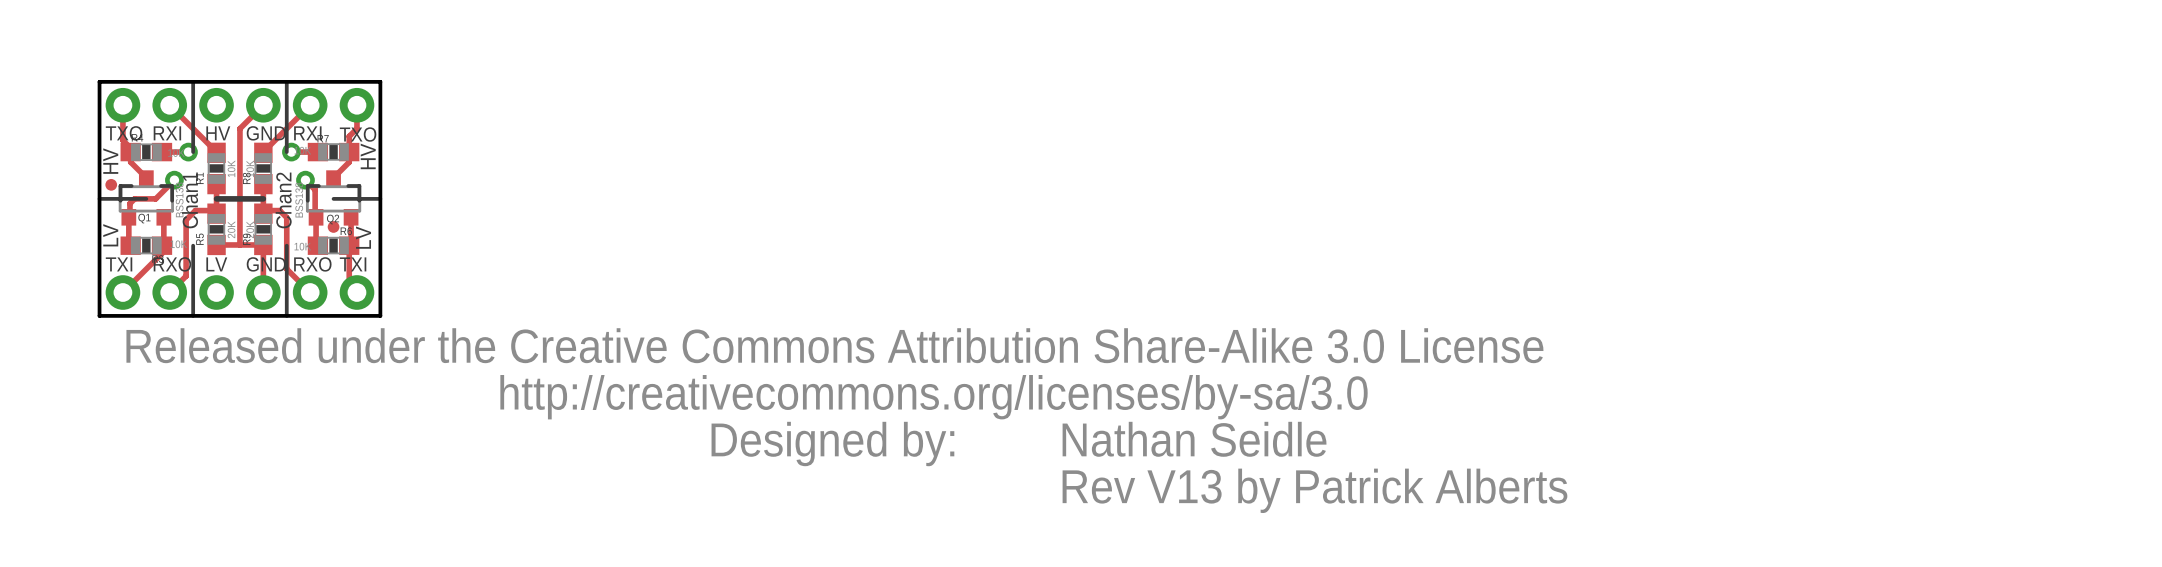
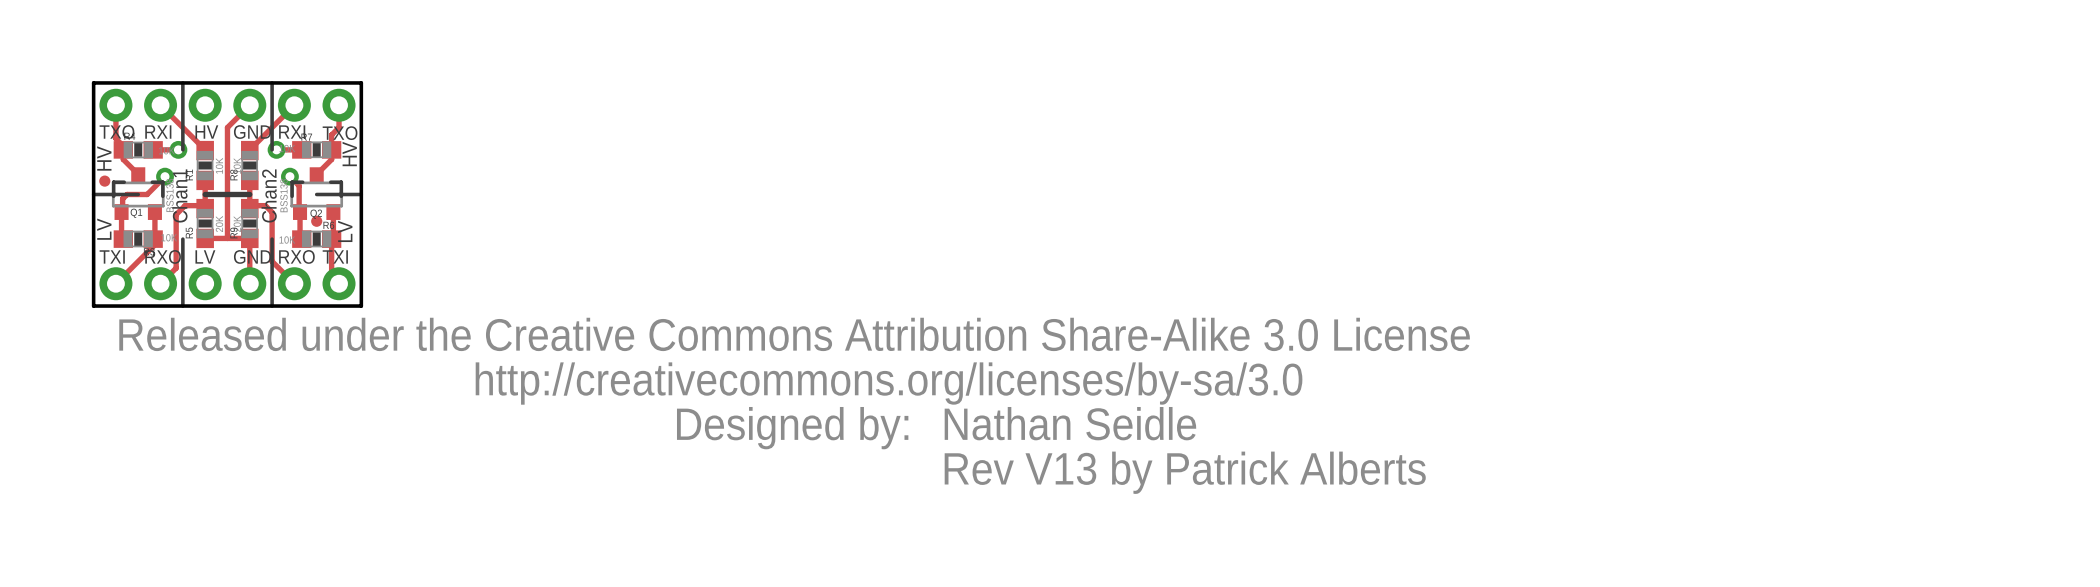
text position: Nathan Seidle (1194, 439) -> Nathan Seidle (1070, 423)
text position: Rev V13 by Patrick Alberts (1314, 490) -> Rev V13 by Patrick Alberts (1185, 472)

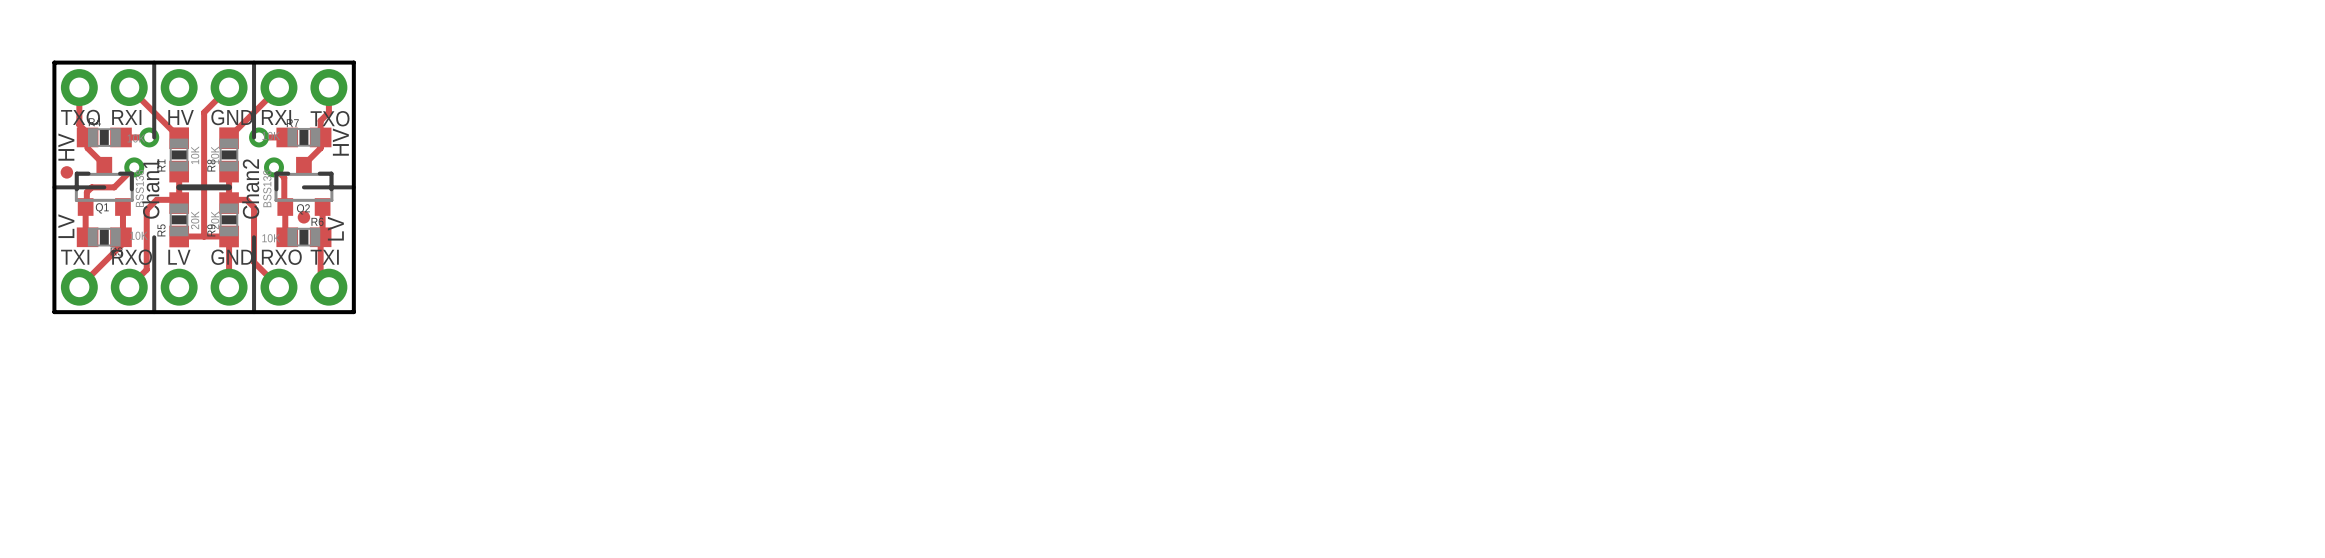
drawing: [119, 317, 1470, 450] -> none
text: Nathan Seidle (1070, 423) -> none
text: Rev V13 by Patrick Alberts (1185, 472) -> none

